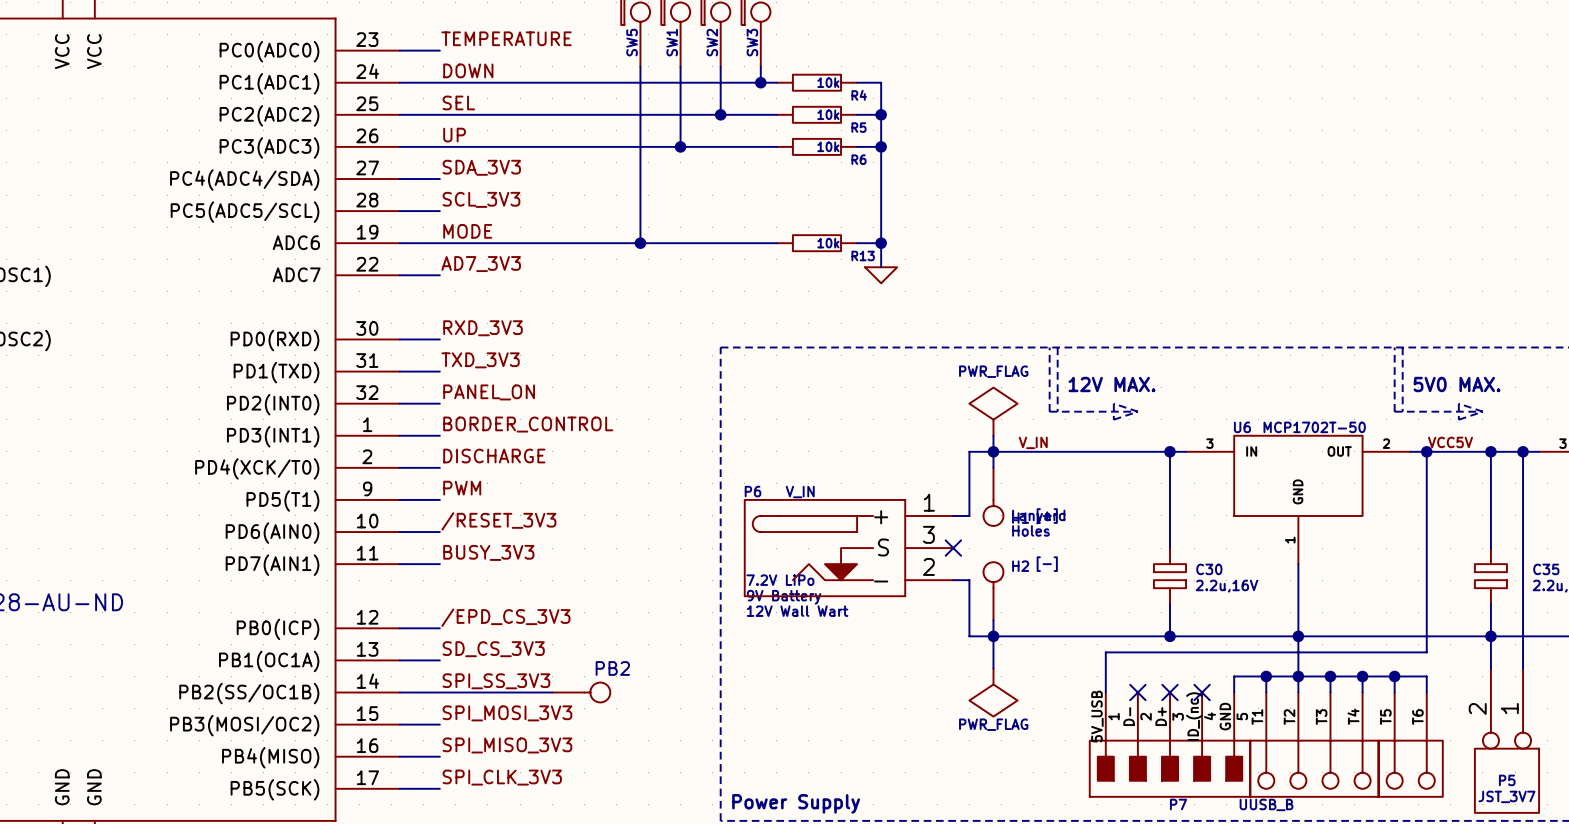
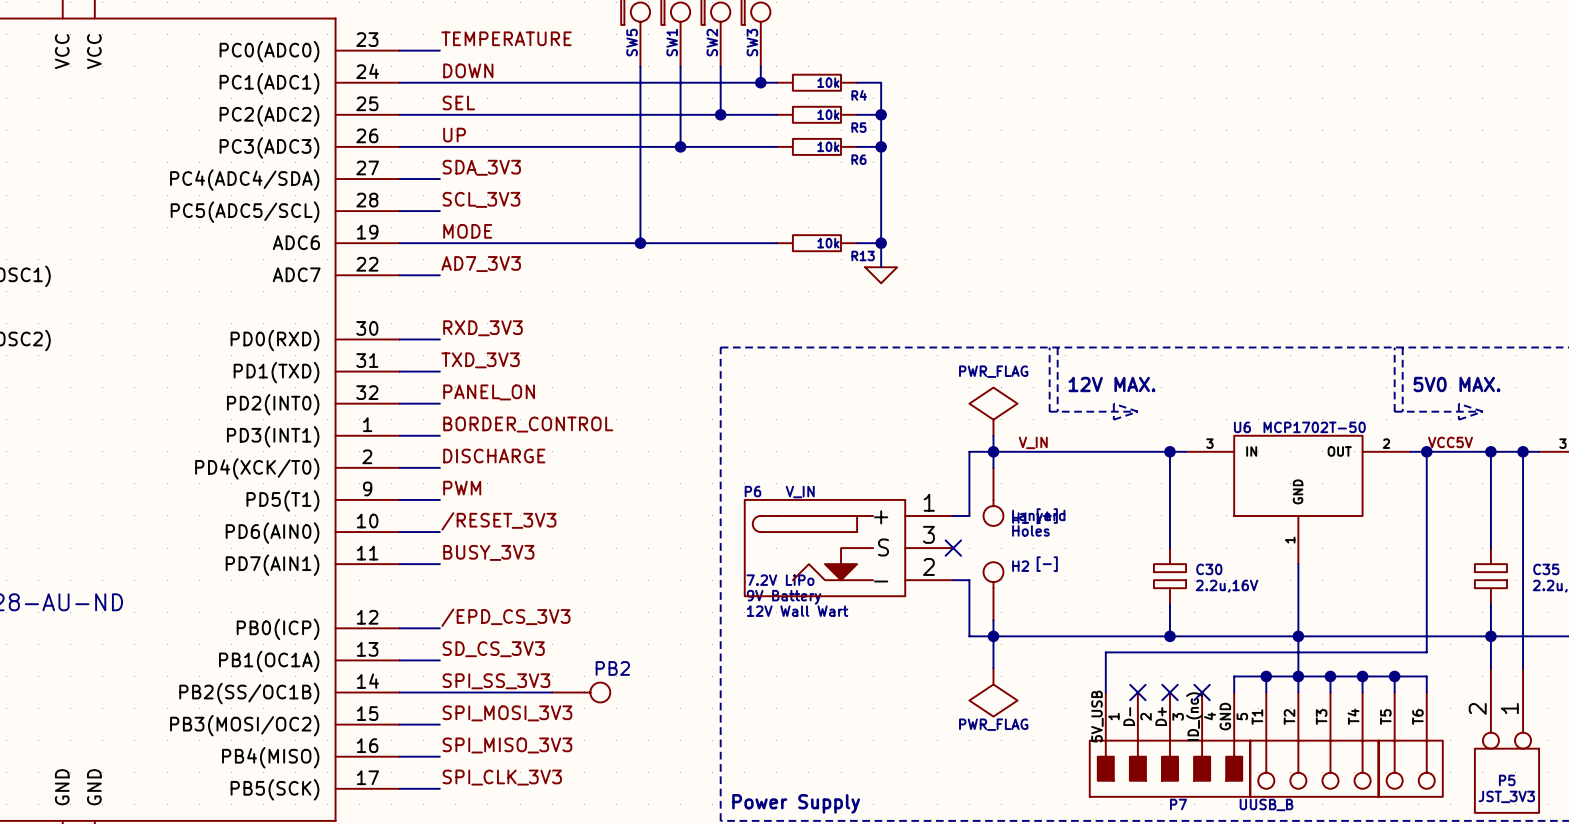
P5 value: JST_3V7 (1506, 796) -> JST_3V3 (1506, 796)

